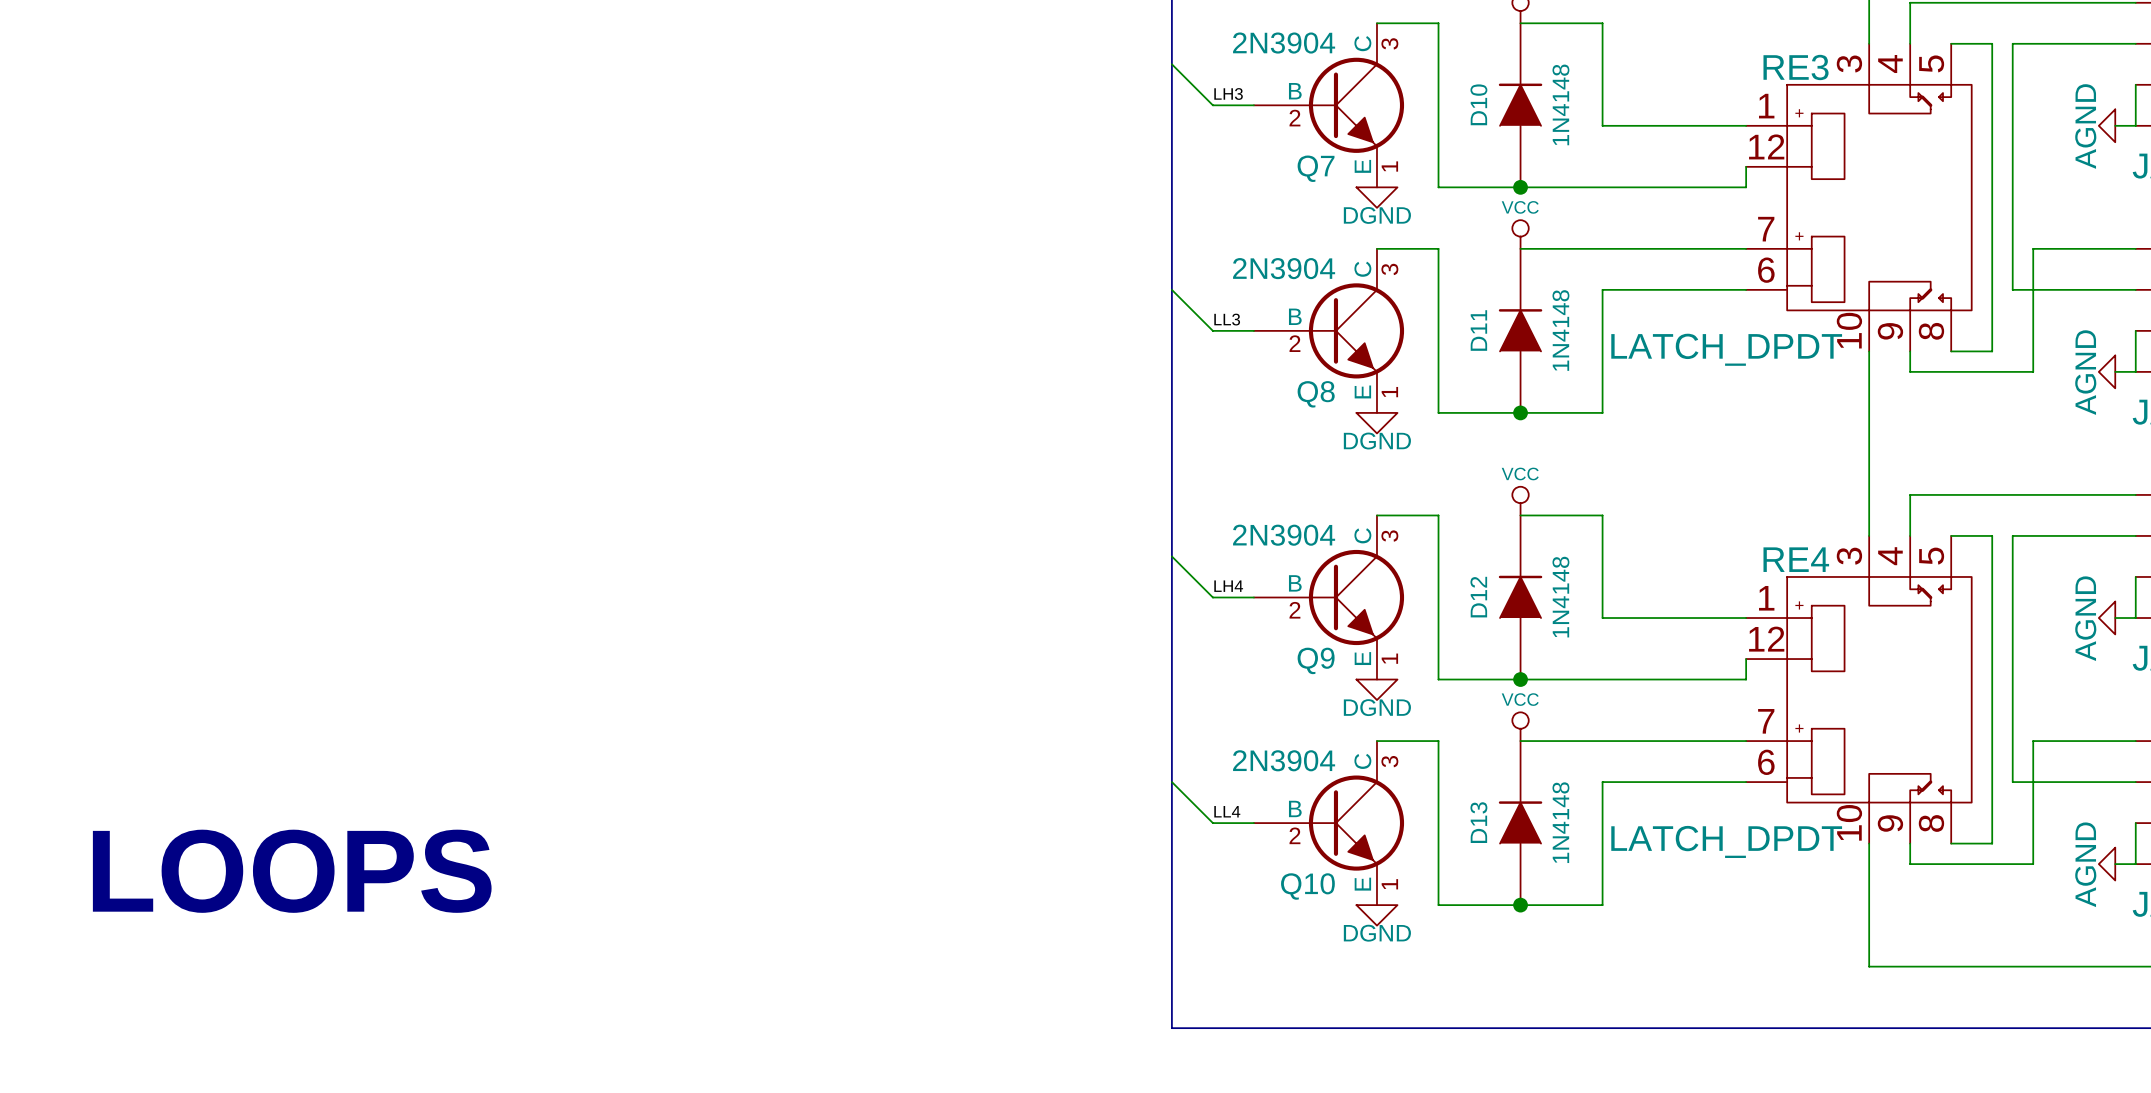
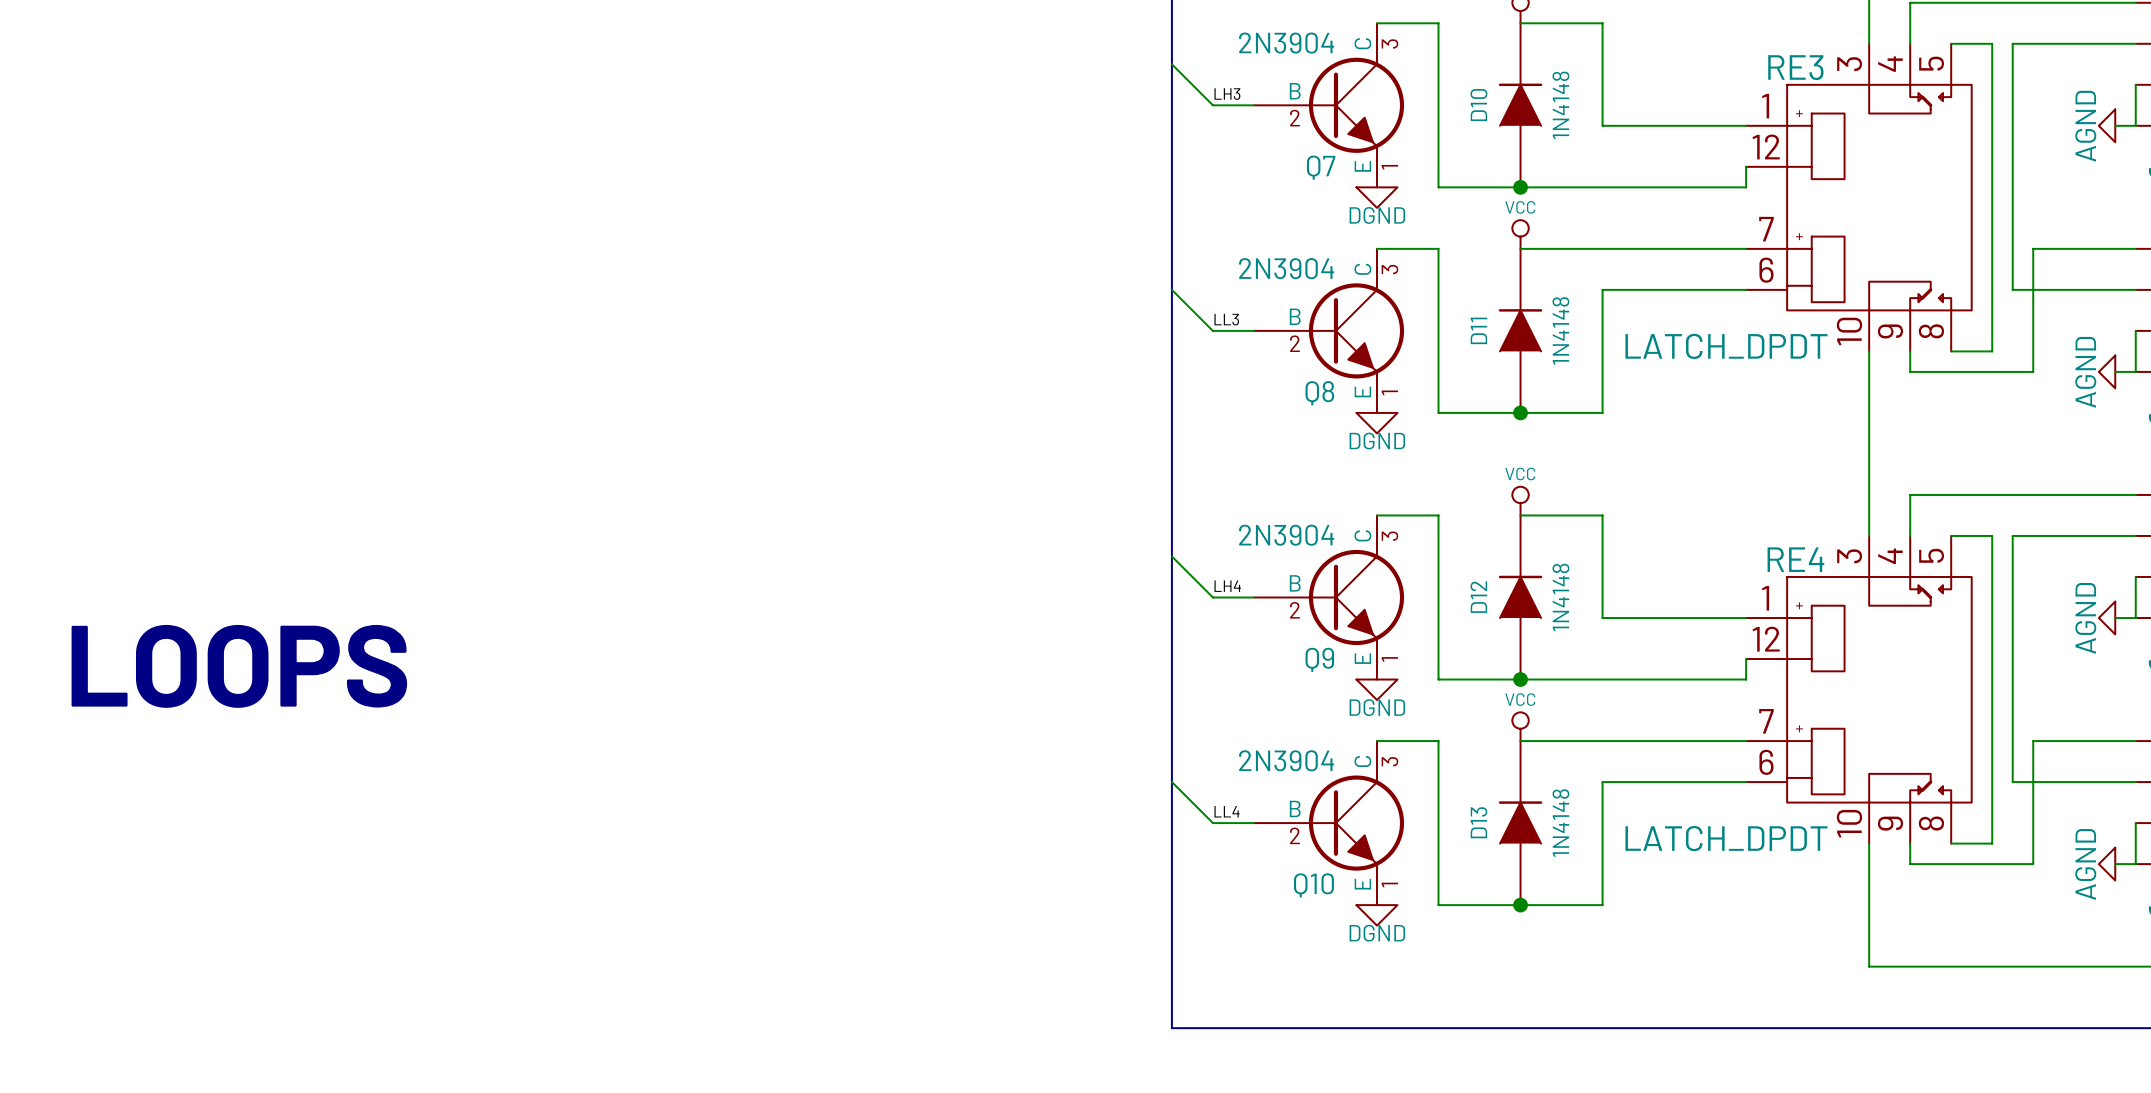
text position: LOOPS (292, 871) -> LOOPS (239, 666)

